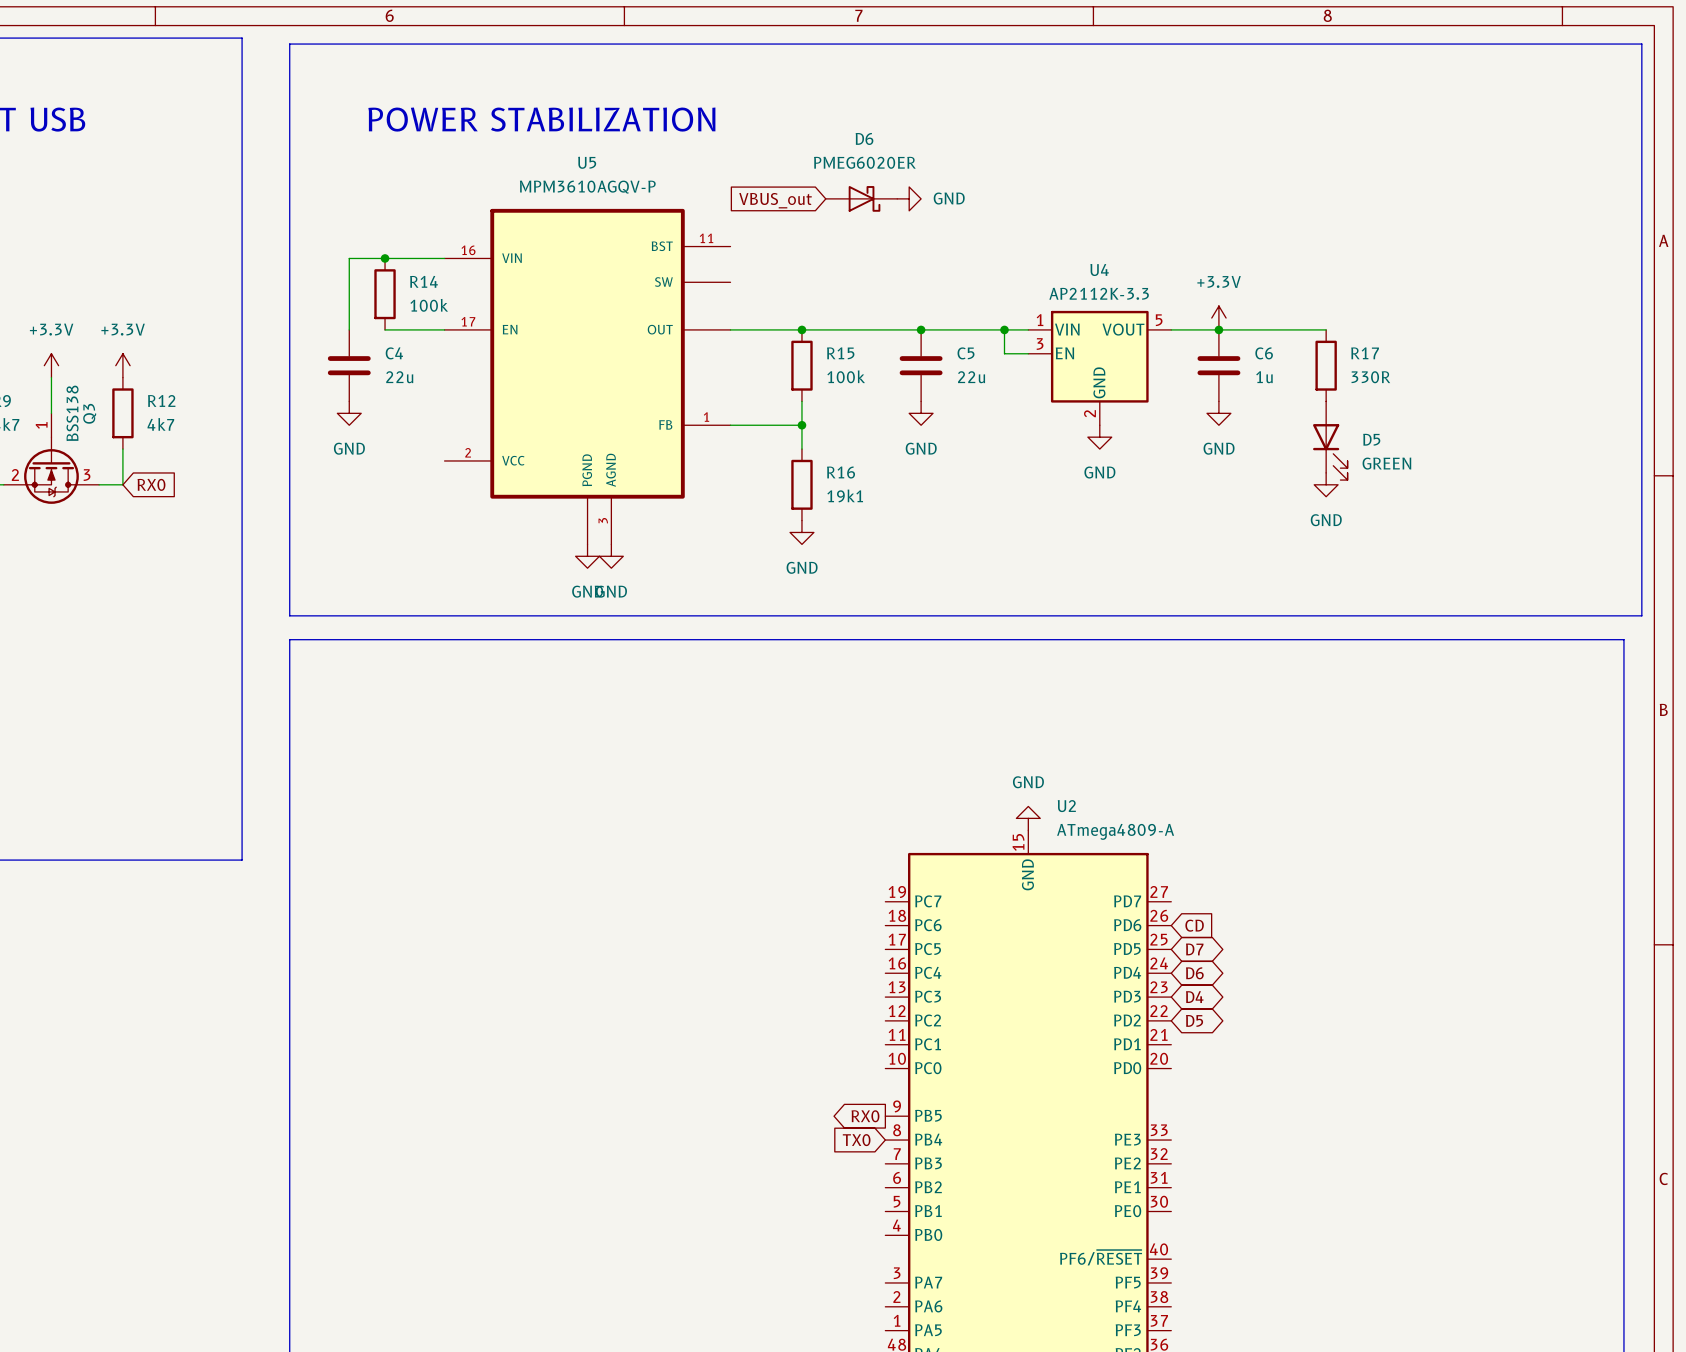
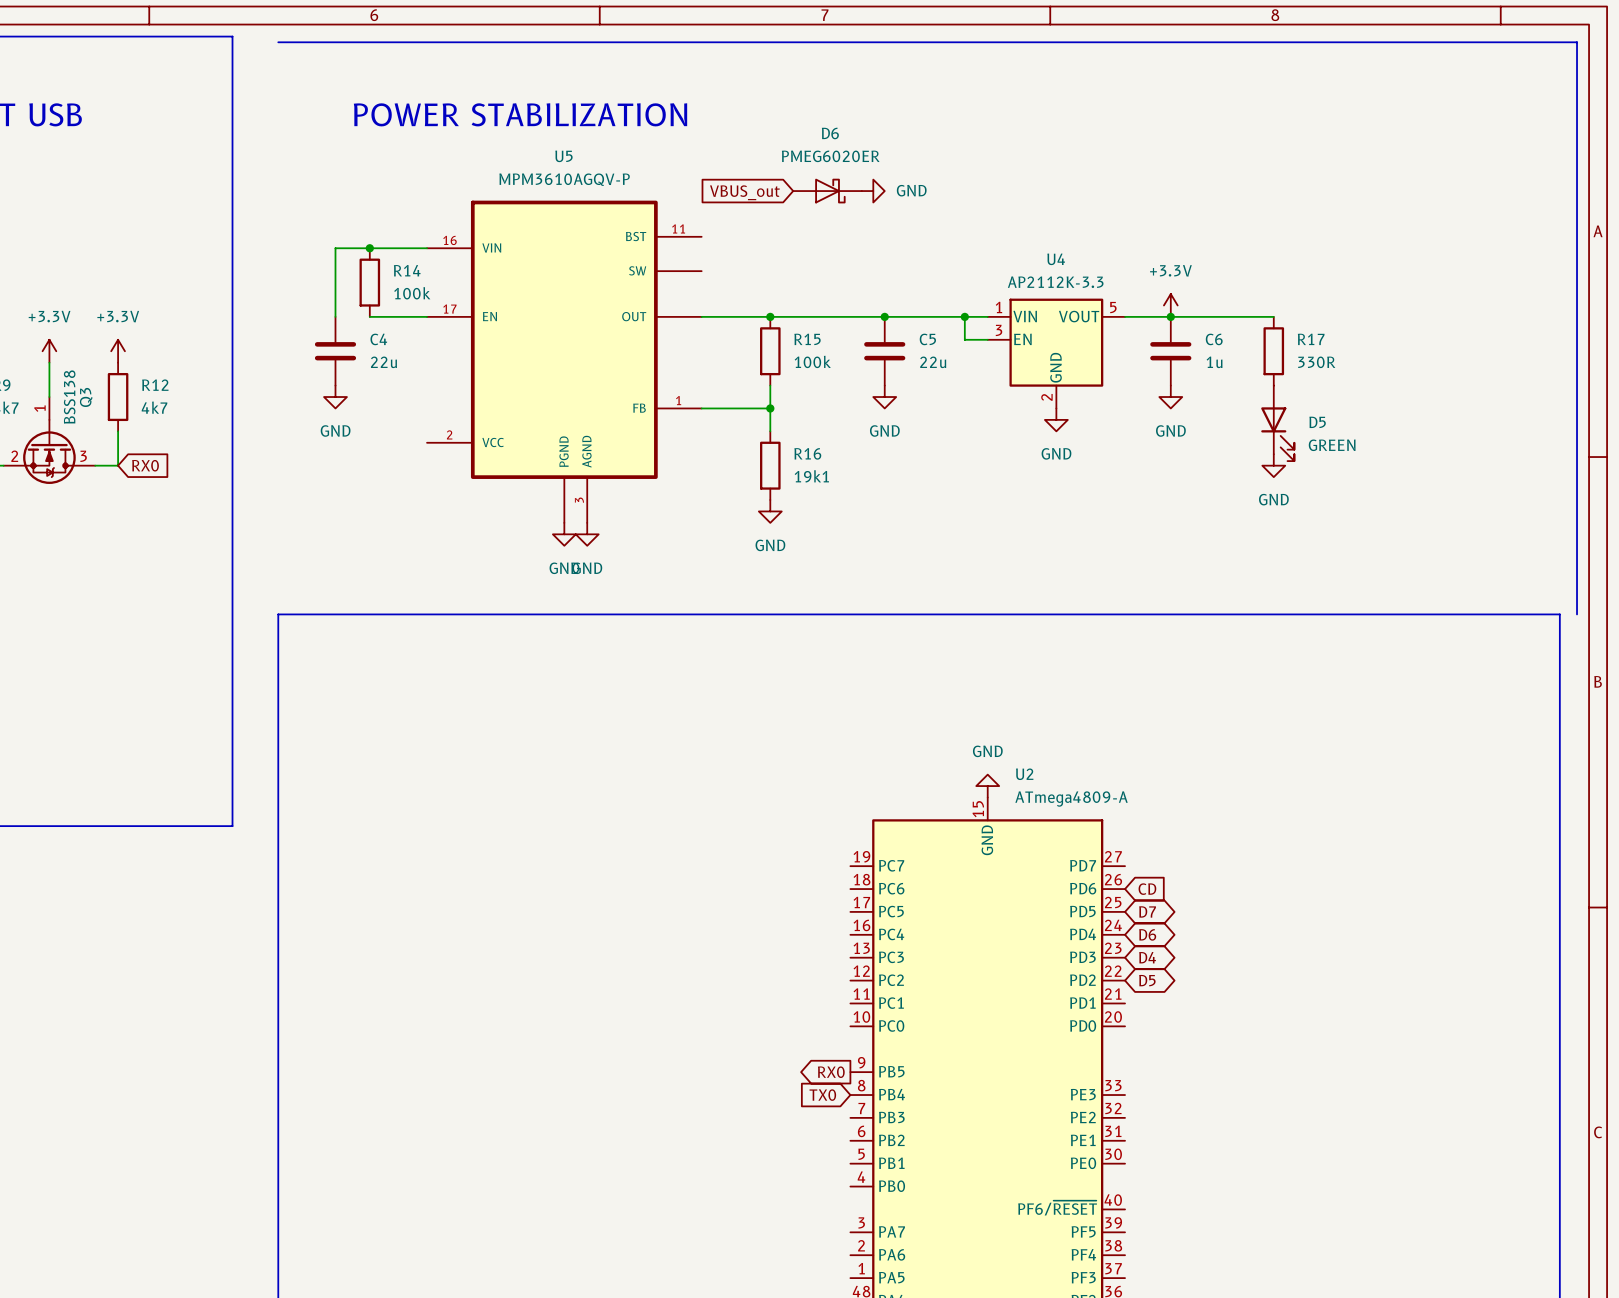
line: (289, 44) (289, 615) (1641, 615) -> (1577, 614) (1577, 591)

